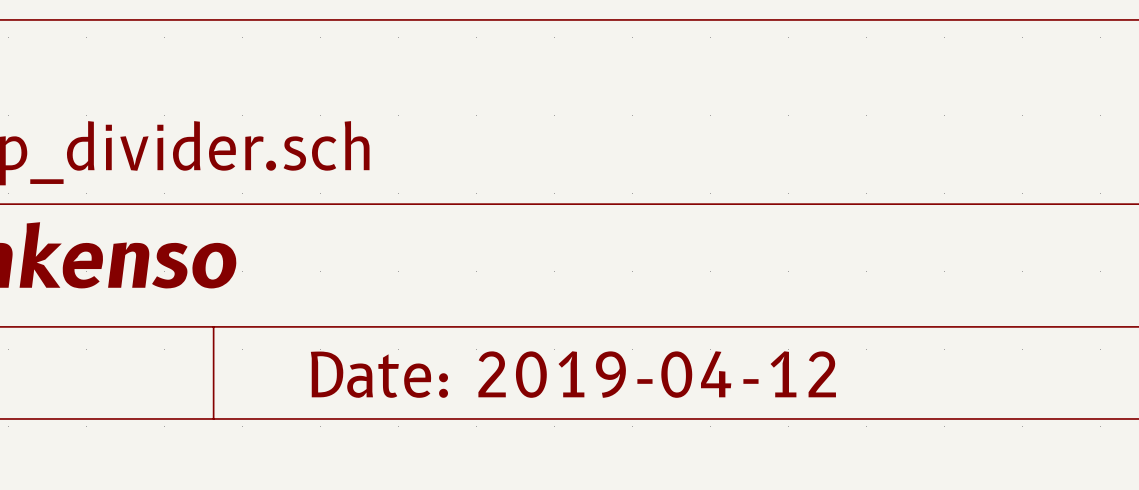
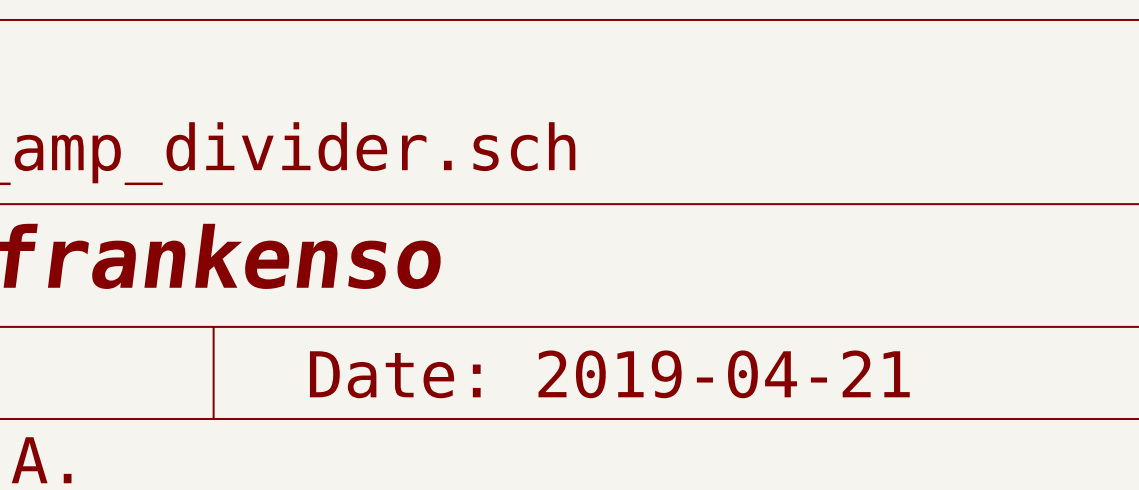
title block: Date: 2019-04-12 (573, 374) -> Date: 2019-04-21 (609, 374)

